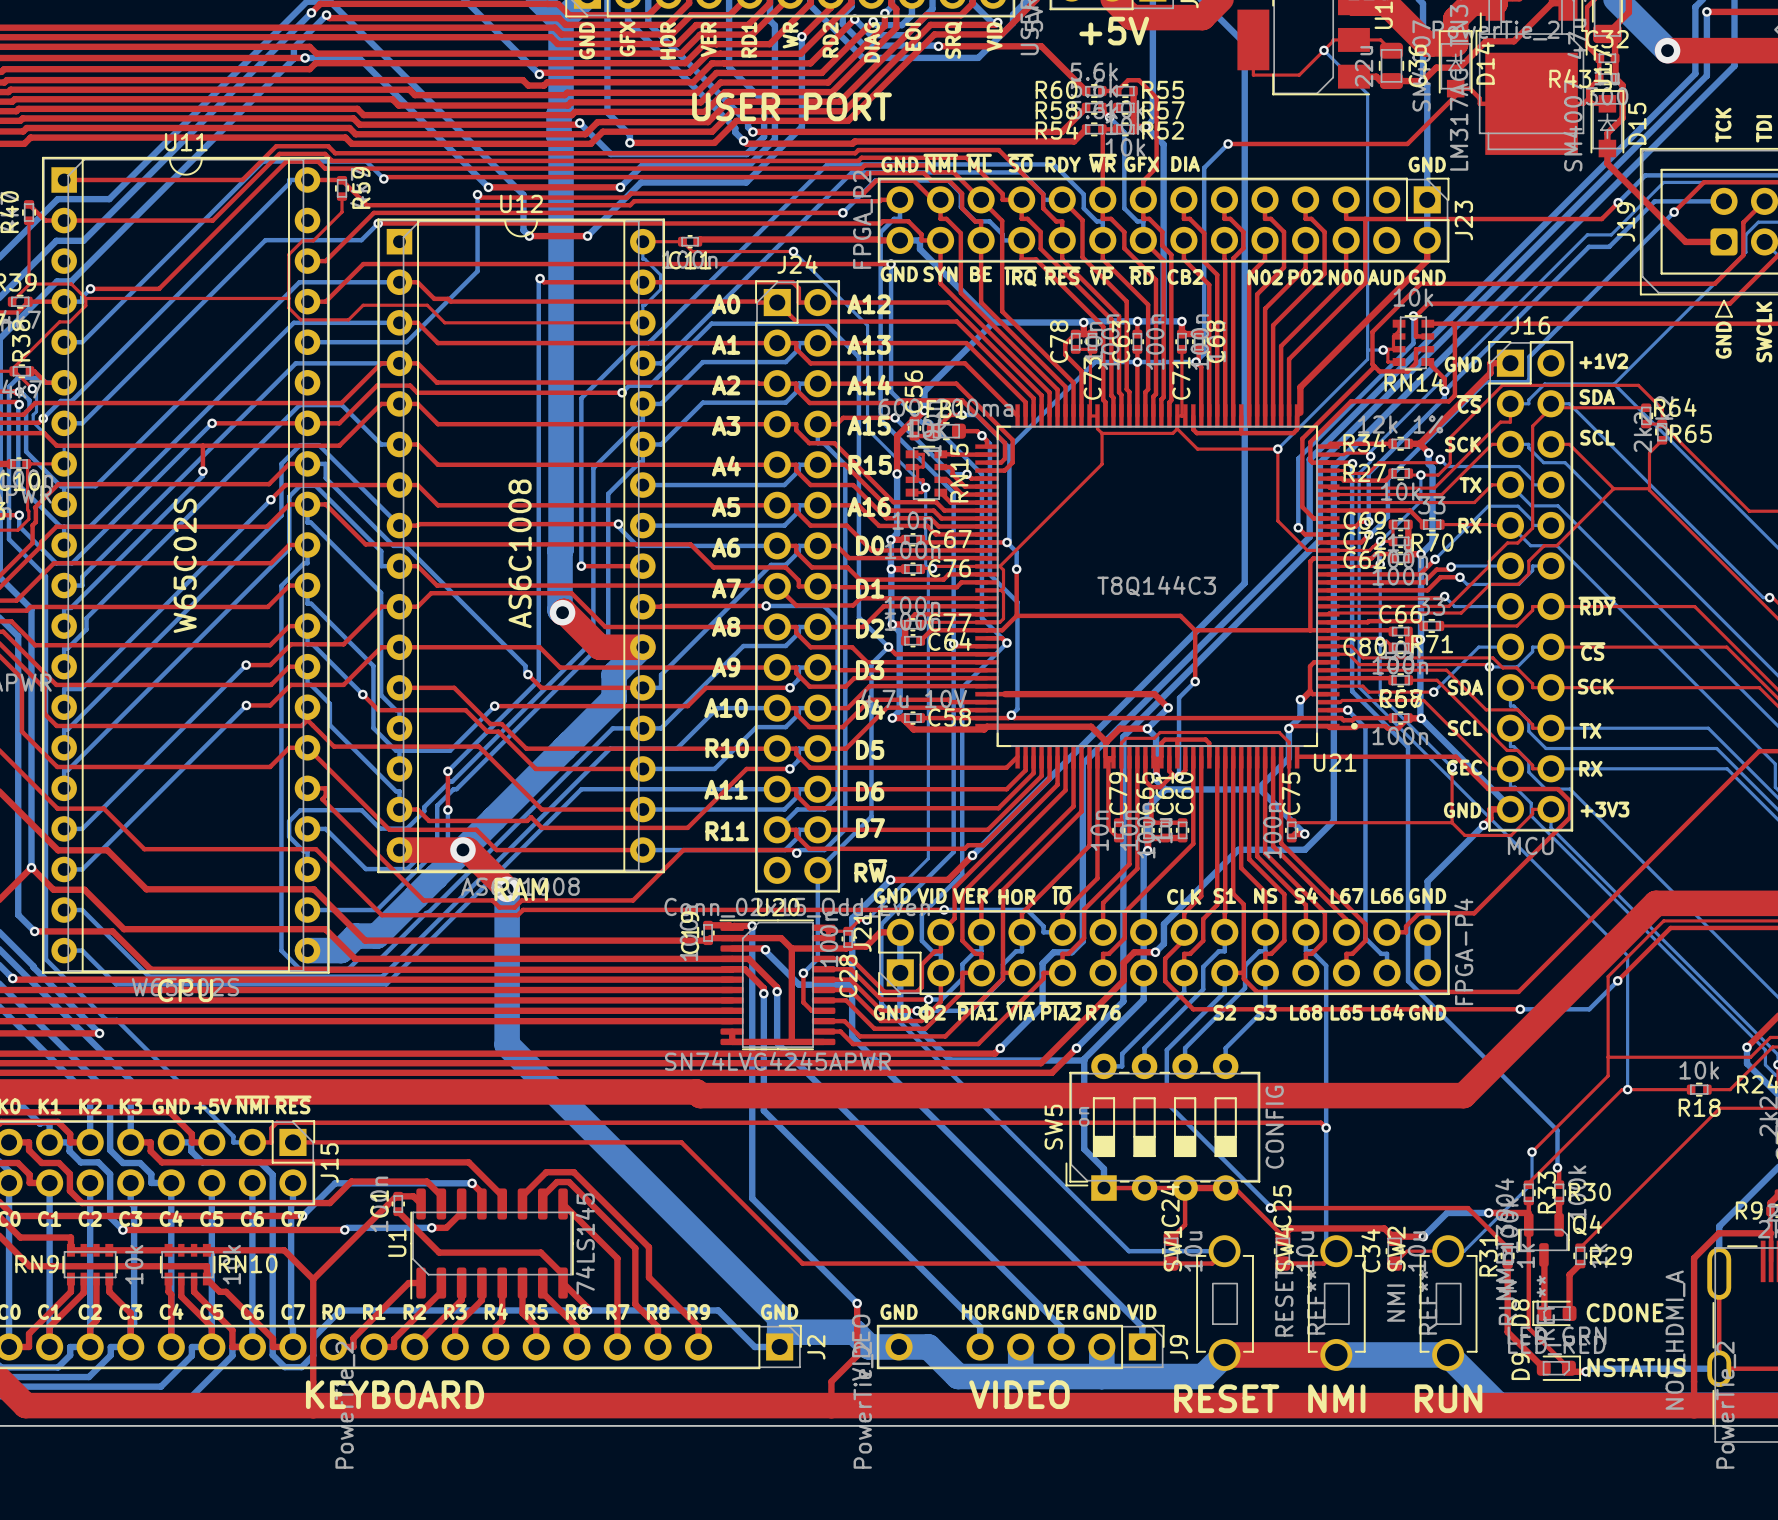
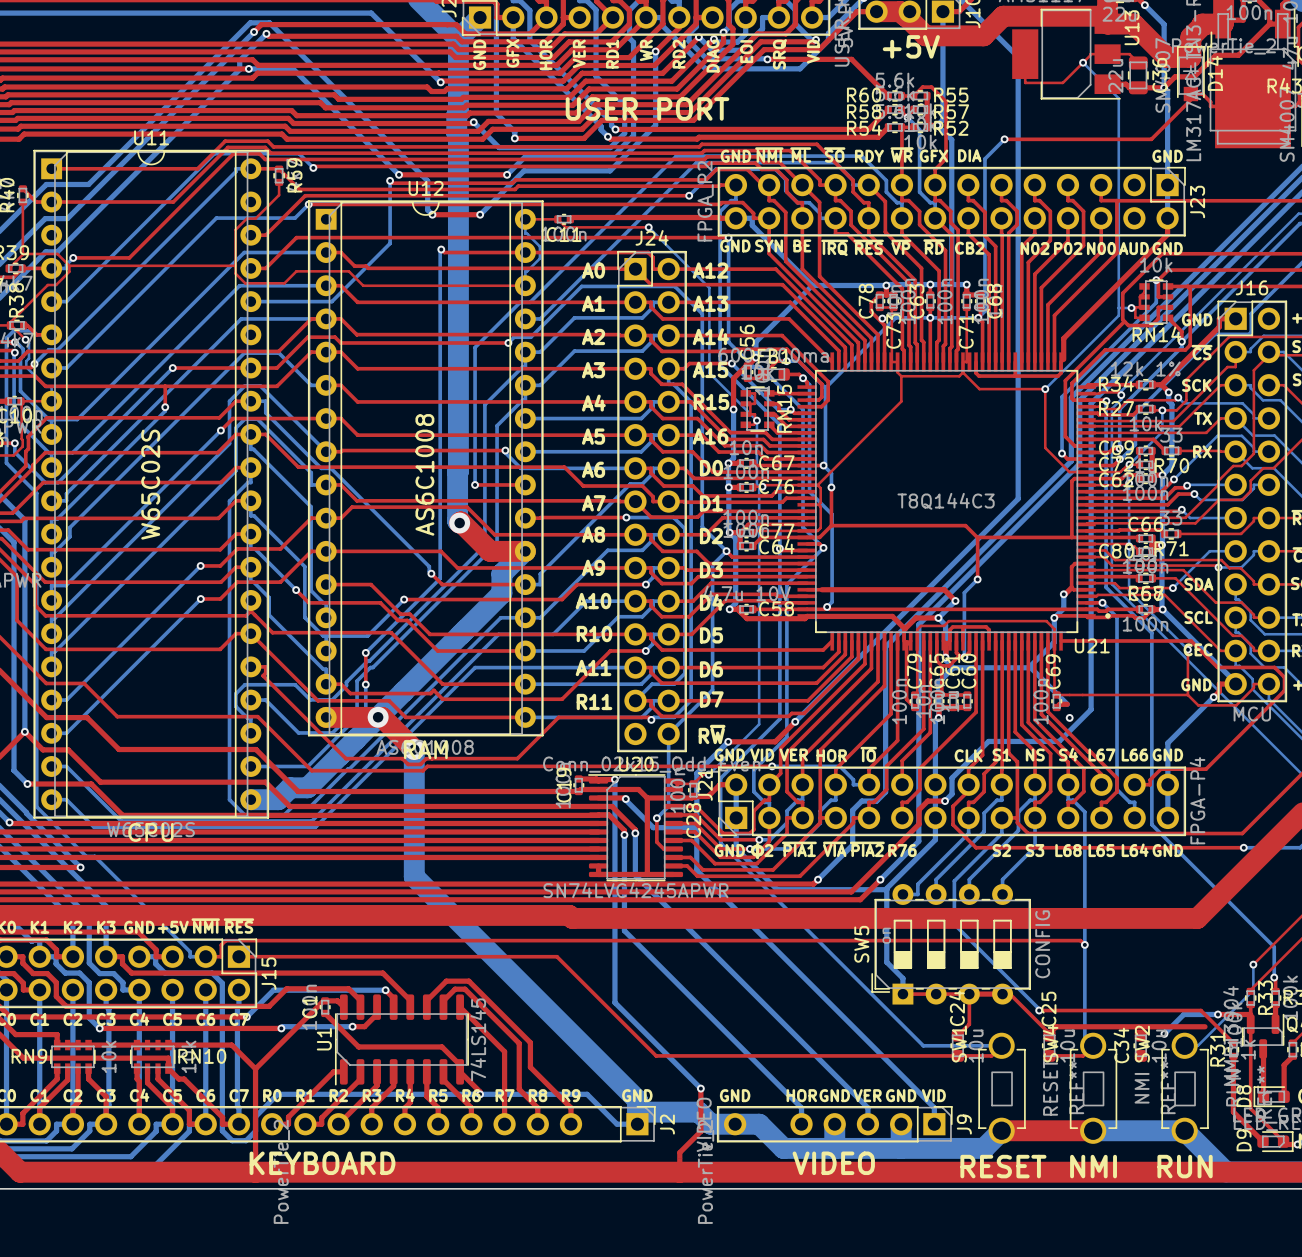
via: none -> (882, 318)
C75 name: C75 (1291, 793) -> C69 (1053, 671)
bottom track: (1333, 820) (1304, 849) (1238, 849) (1208, 879) -> (1091, 693) (1091, 709) (1059, 741) (988, 741)
C79 value: 10n (1099, 830) -> 100n (899, 701)
via position: (1304, 834) -> (1069, 717)
top track: (1290, 1228) (1384, 1228) (1394, 1238) (1396, 1236) (1423, 1236) -> (1055, 1027) (1204, 1026)
top track: (1448, 1251) (1407, 1251) (1394, 1263) -> none

